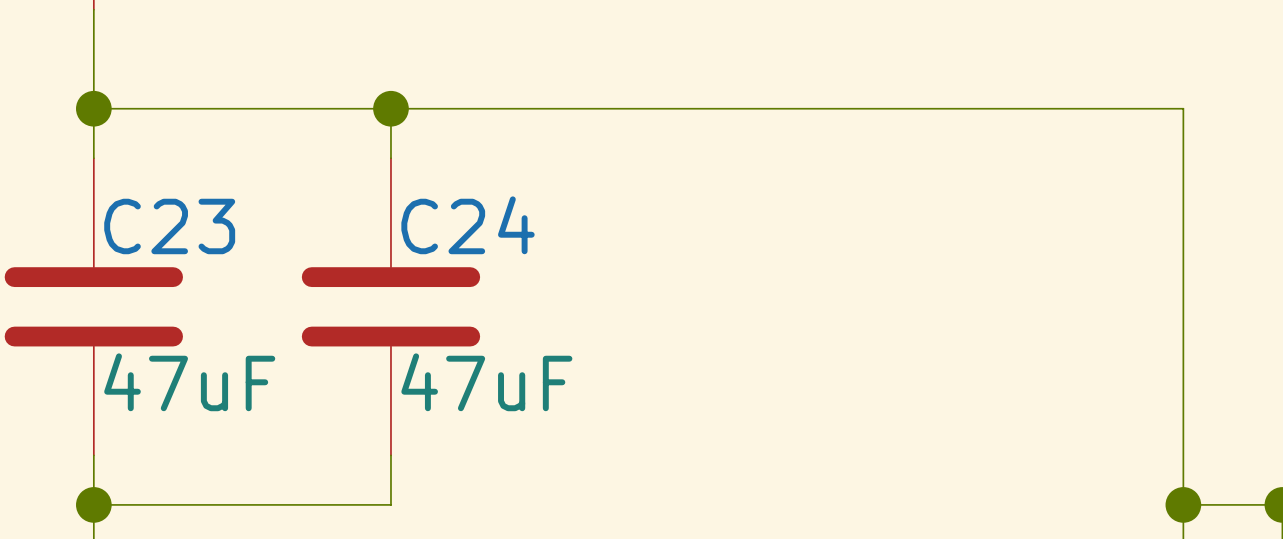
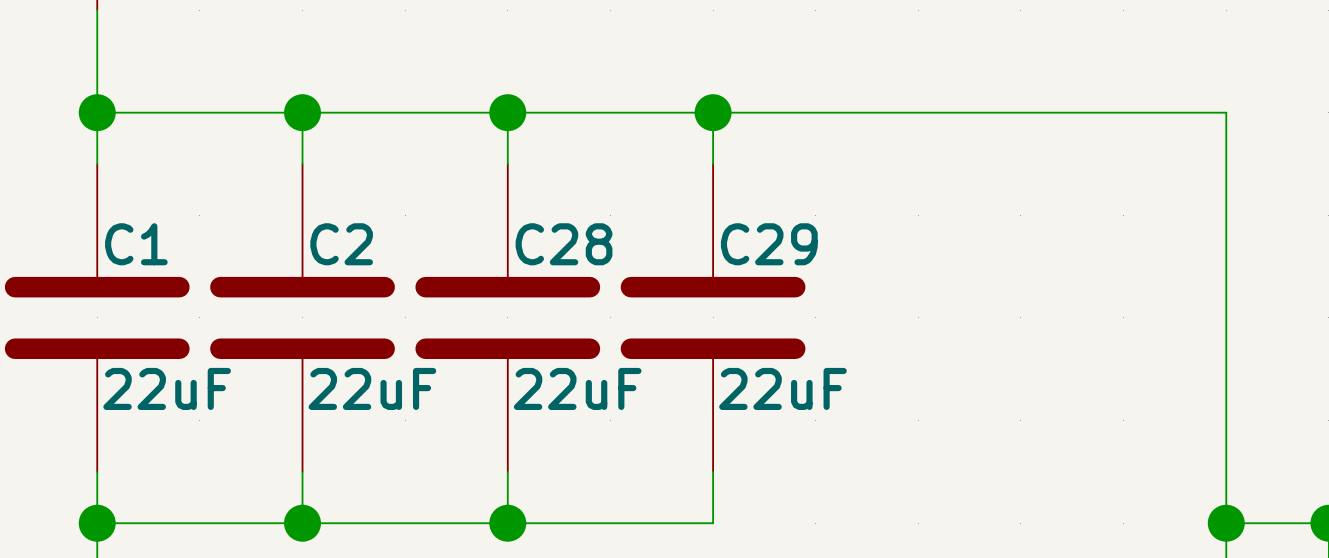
junction: none -> (302, 112)
wire: (390, 108) (390, 158) -> (302, 112) (302, 163)
junction: (390, 108) -> none
wire: none -> (507, 112) (507, 163)
junction: none -> (507, 112)
wire: none -> (713, 112) (713, 163)
junction: none -> (713, 112)
C23 name: C23 (169, 226) -> C1 (136, 244)
C2: none -> 22uF (302, 317)
C24: 47uF (390, 306) -> none
C28: none -> 22uF (507, 317)
C29: none -> 22uF (713, 317)
C23 value: 47uF (189, 382) -> 22uF (167, 388)
wire: none -> (302, 471) (302, 523)
wire: (390, 455) (390, 504) -> (713, 471) (713, 523) (405, 523)
wire: none -> (507, 471) (507, 523)
junction: none -> (302, 523)
junction: none -> (507, 523)

